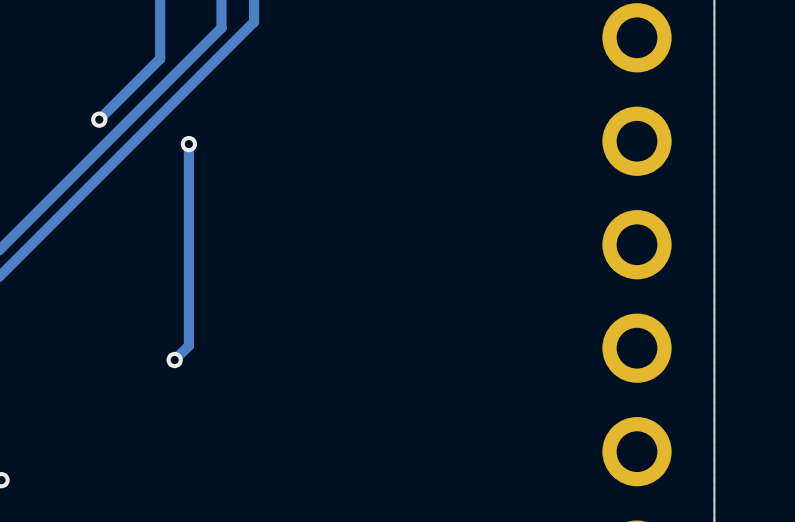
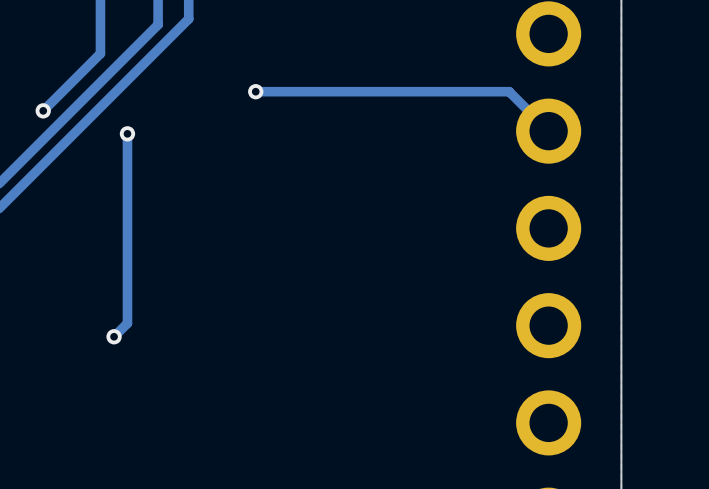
track: none -> (255, 91) (509, 91) (548, 131)
via: none -> (255, 91)

